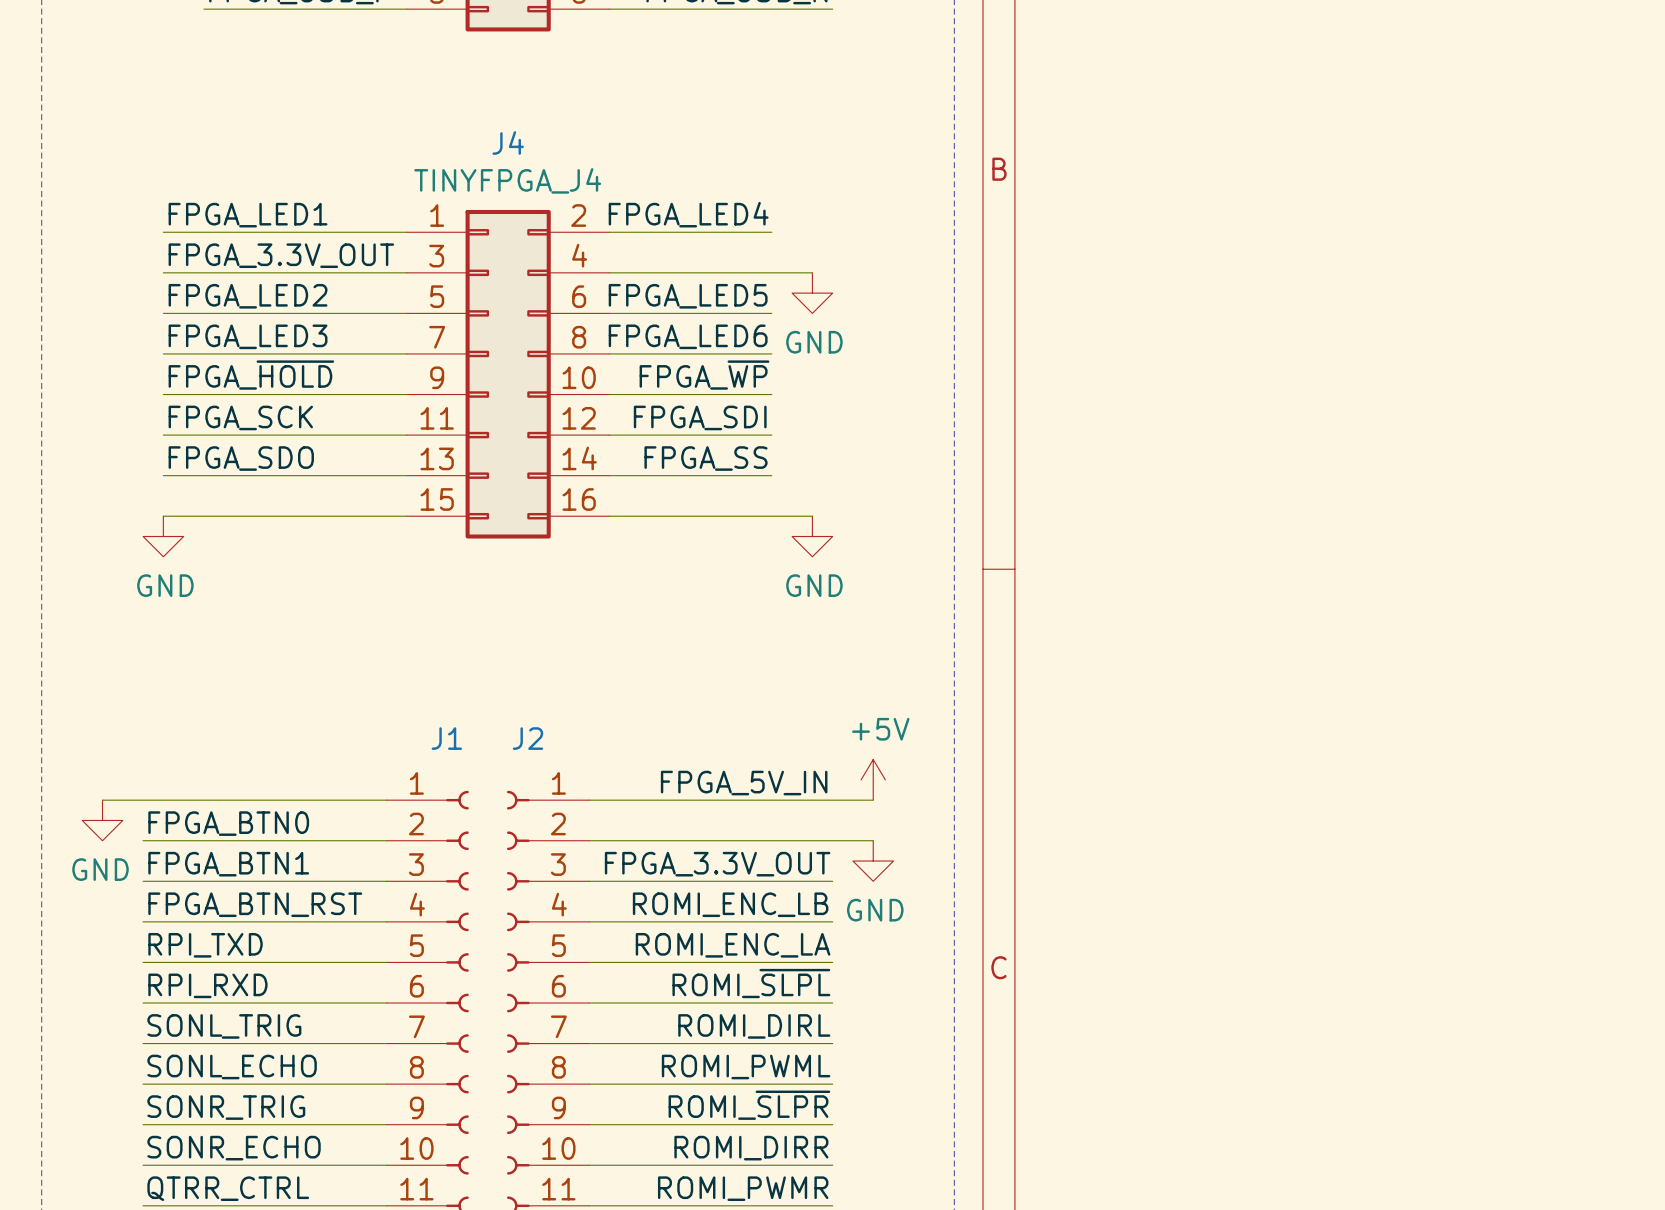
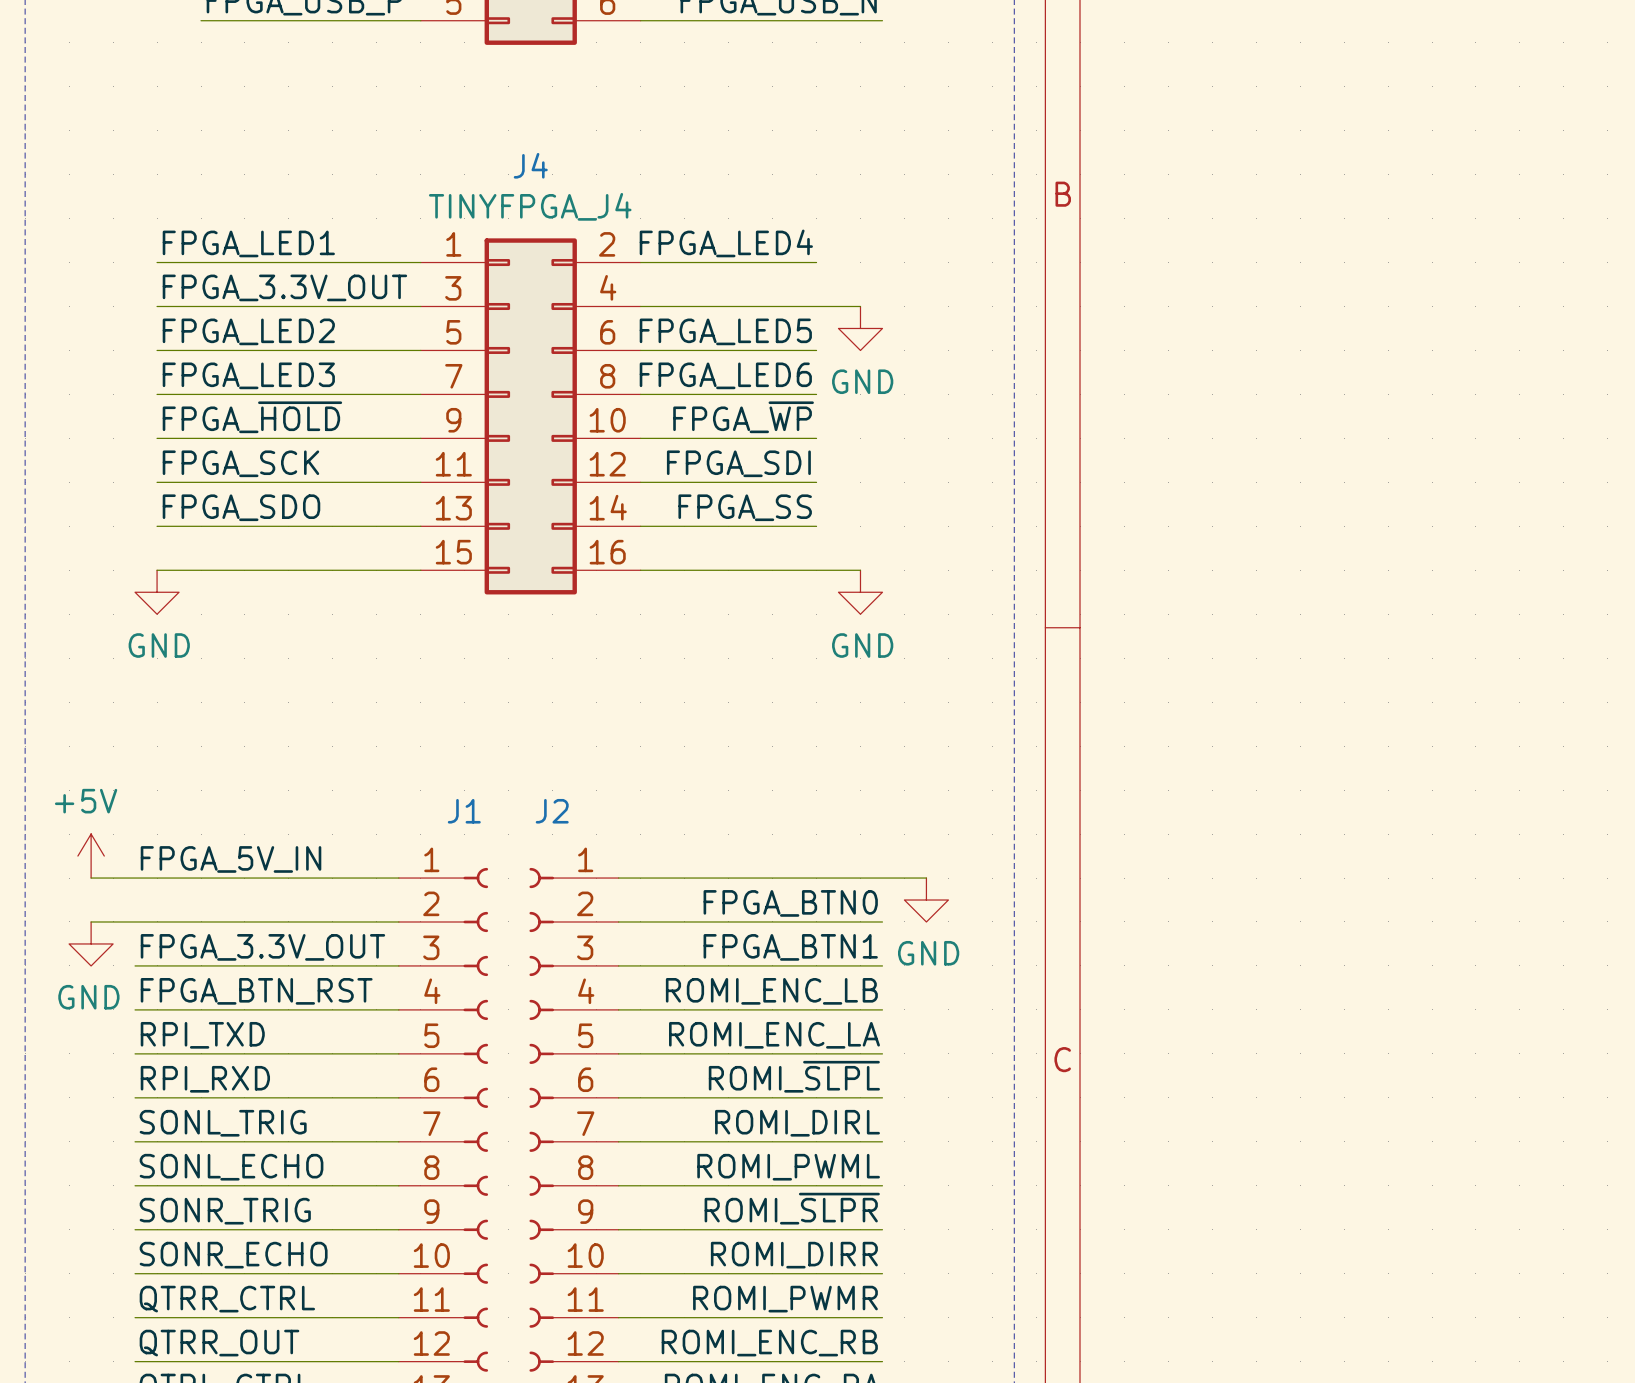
power symbol: none -> +5V (91, 856)
power symbol: +5V (873, 779) -> none
label: FPGA_5V_IN (744, 783) -> FPGA_BTN0 (790, 903)
power symbol position: GND (102, 820) -> GND (91, 943)
label: FPGA_BTN0 (228, 823) -> FPGA_5V_IN (231, 859)
wire: none -> (91, 921) (135, 921)
wire: (832, 840) (873, 840) -> none
power symbol position: GND (873, 861) -> GND (926, 900)
label: FPGA_BTN1 (228, 864) -> FPGA_3.3V_OUT (262, 947)
label: FPGA_3.3V_OUT (717, 864) -> FPGA_BTN1 (790, 947)

